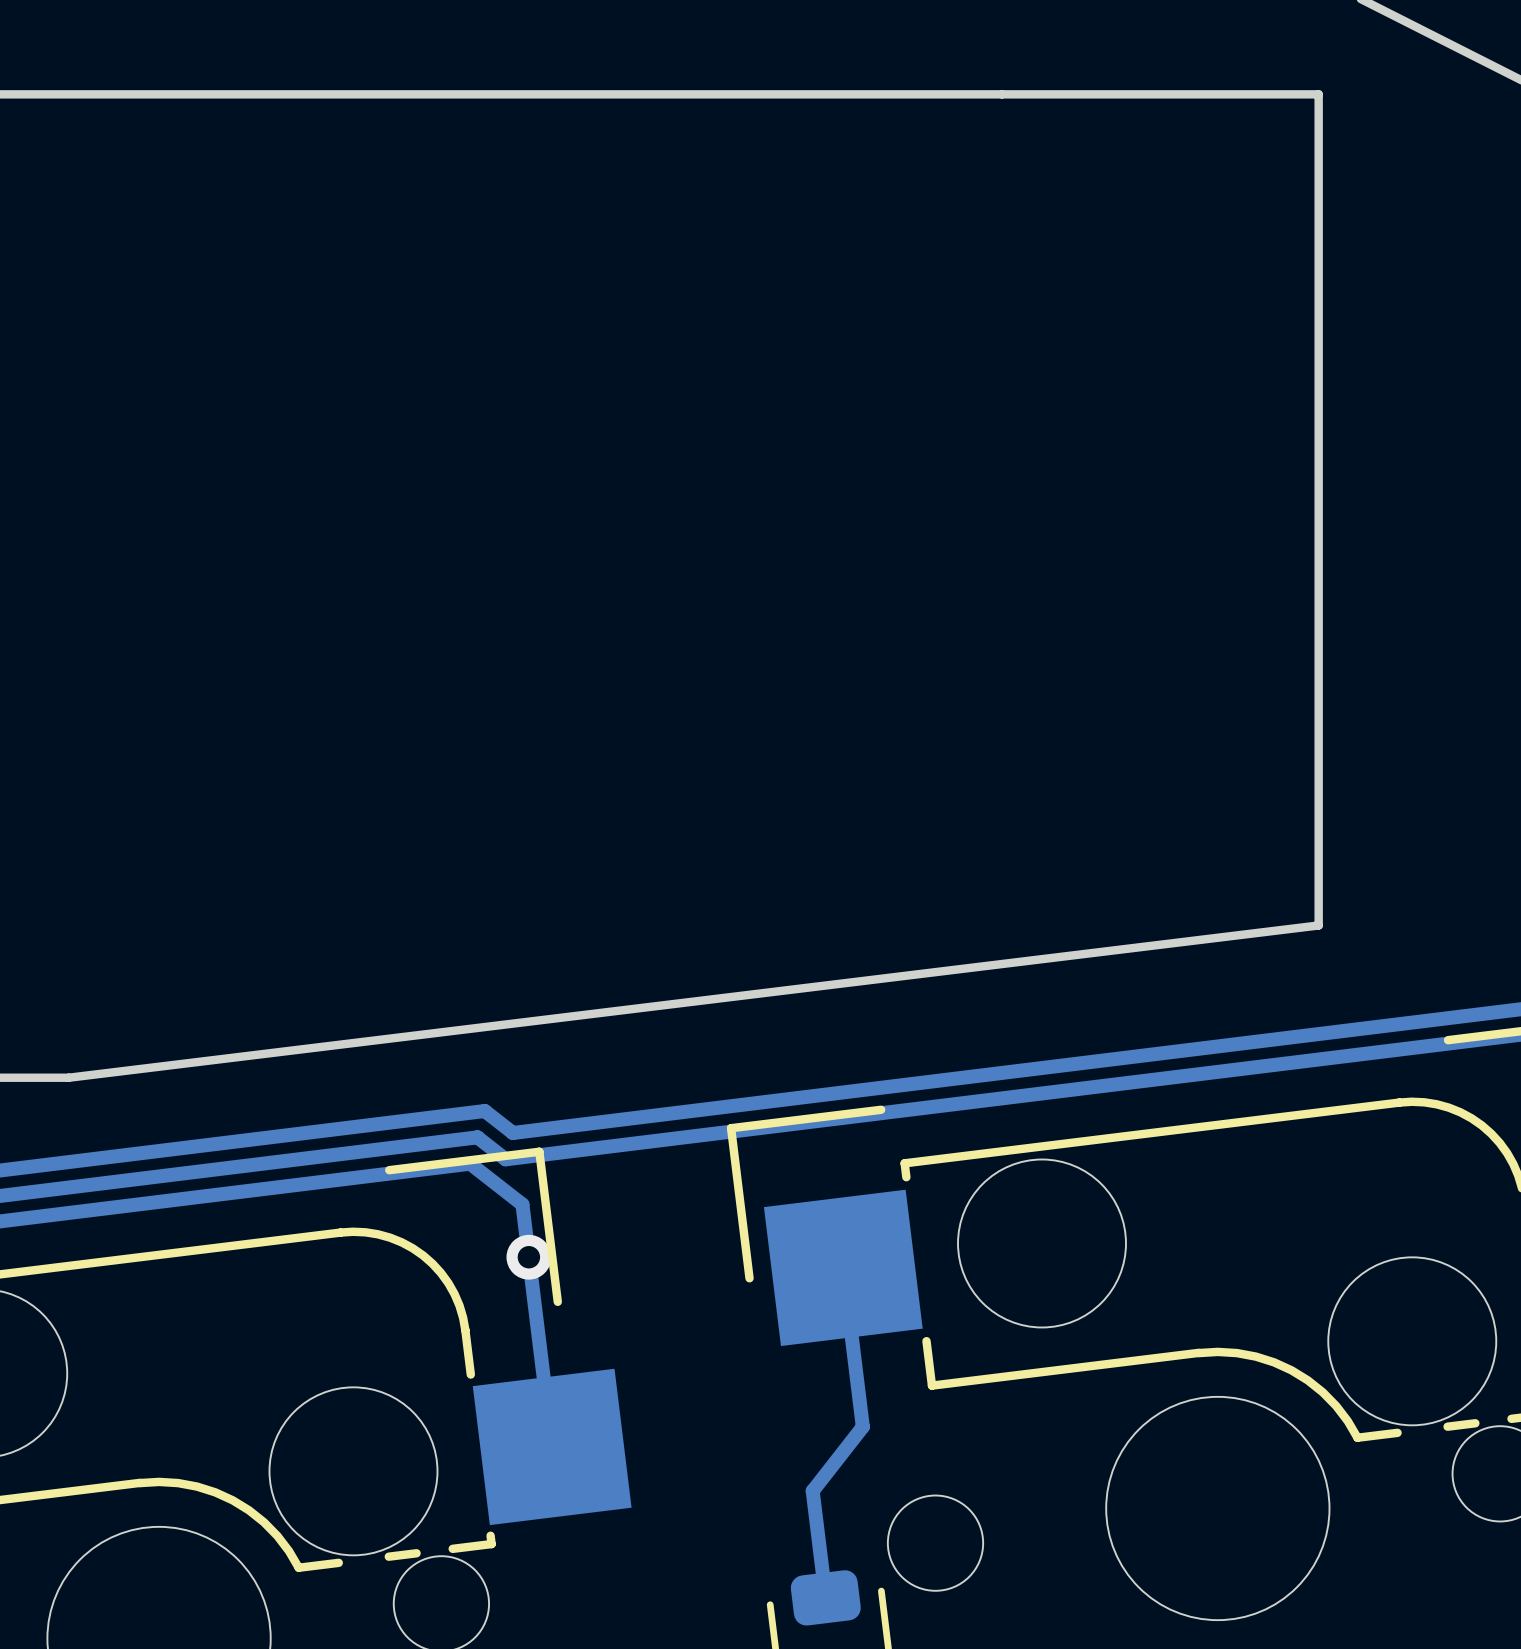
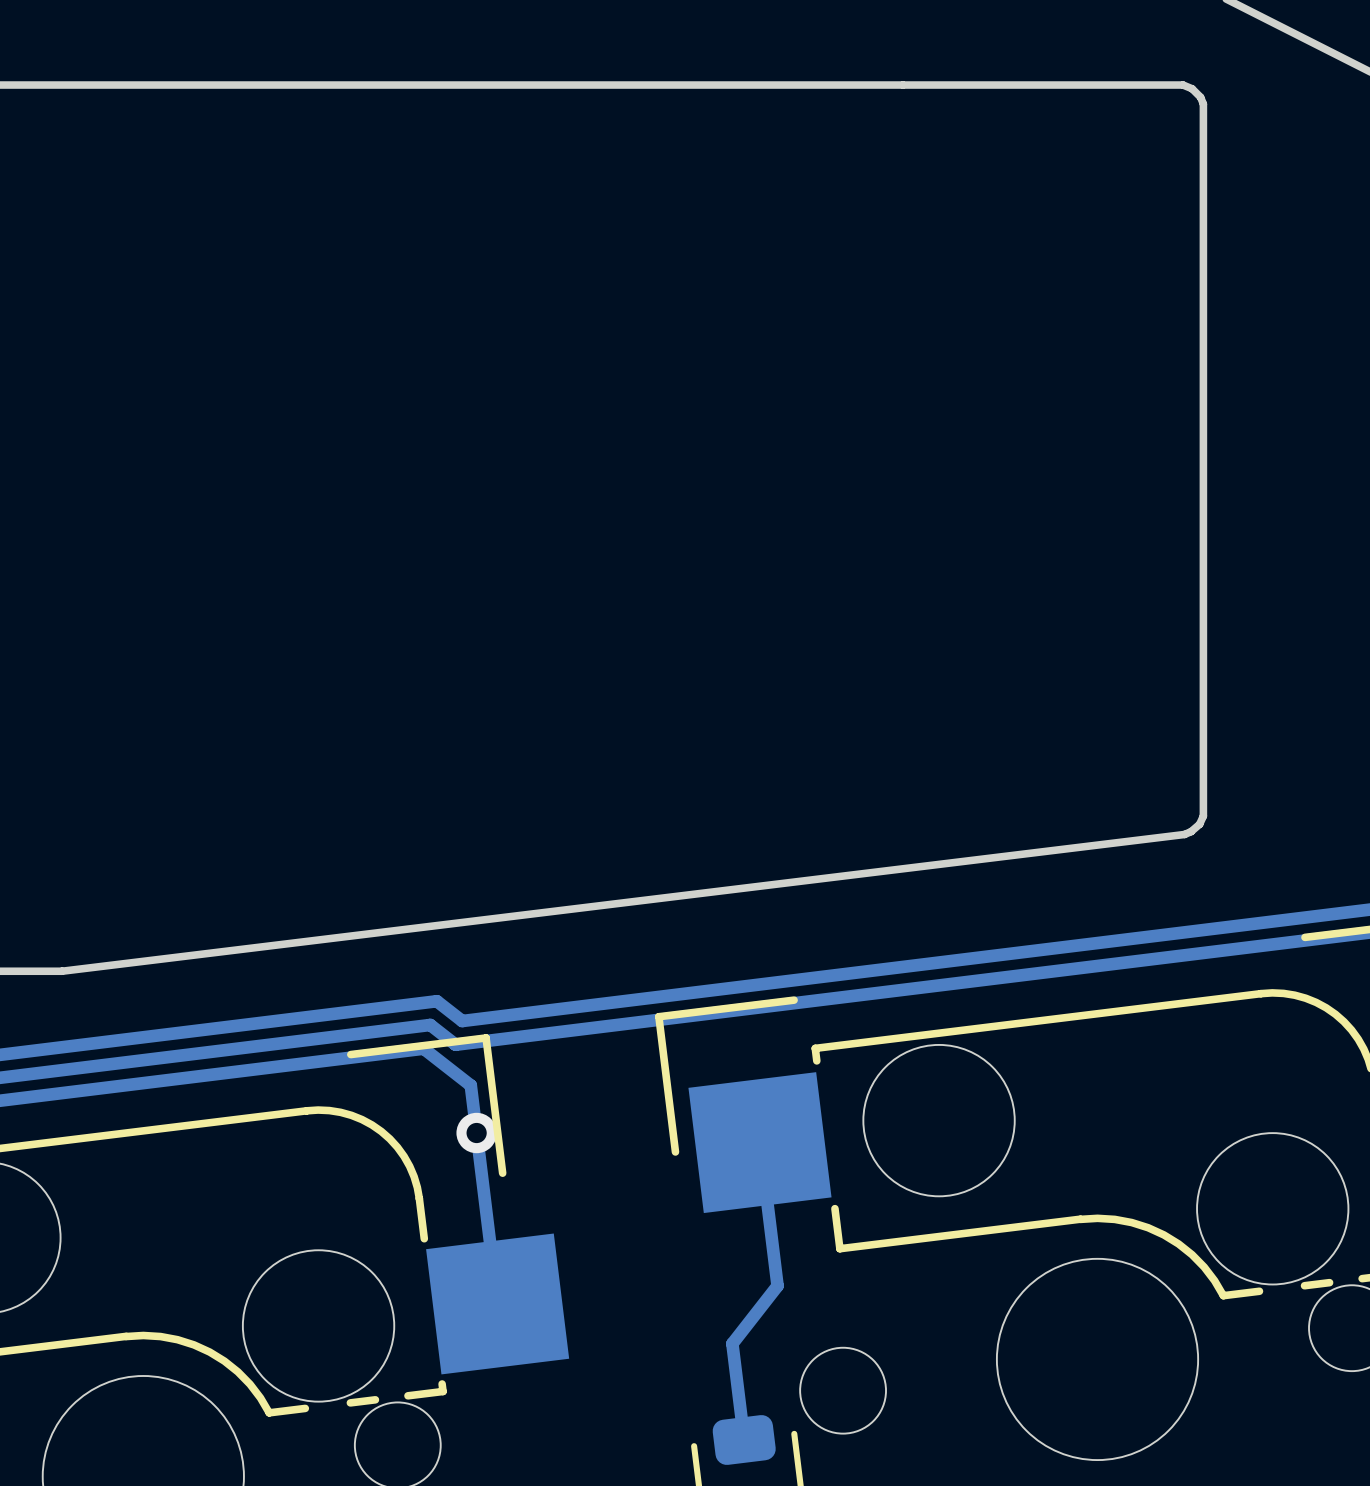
board edge: (1312, 94) (1318, 94) (1318, 925) (1314, 925) -> (1183, 85) (1192, 88) (1200, 97) (1203, 104) (1203, 816) (1199, 824) (1184, 834)

